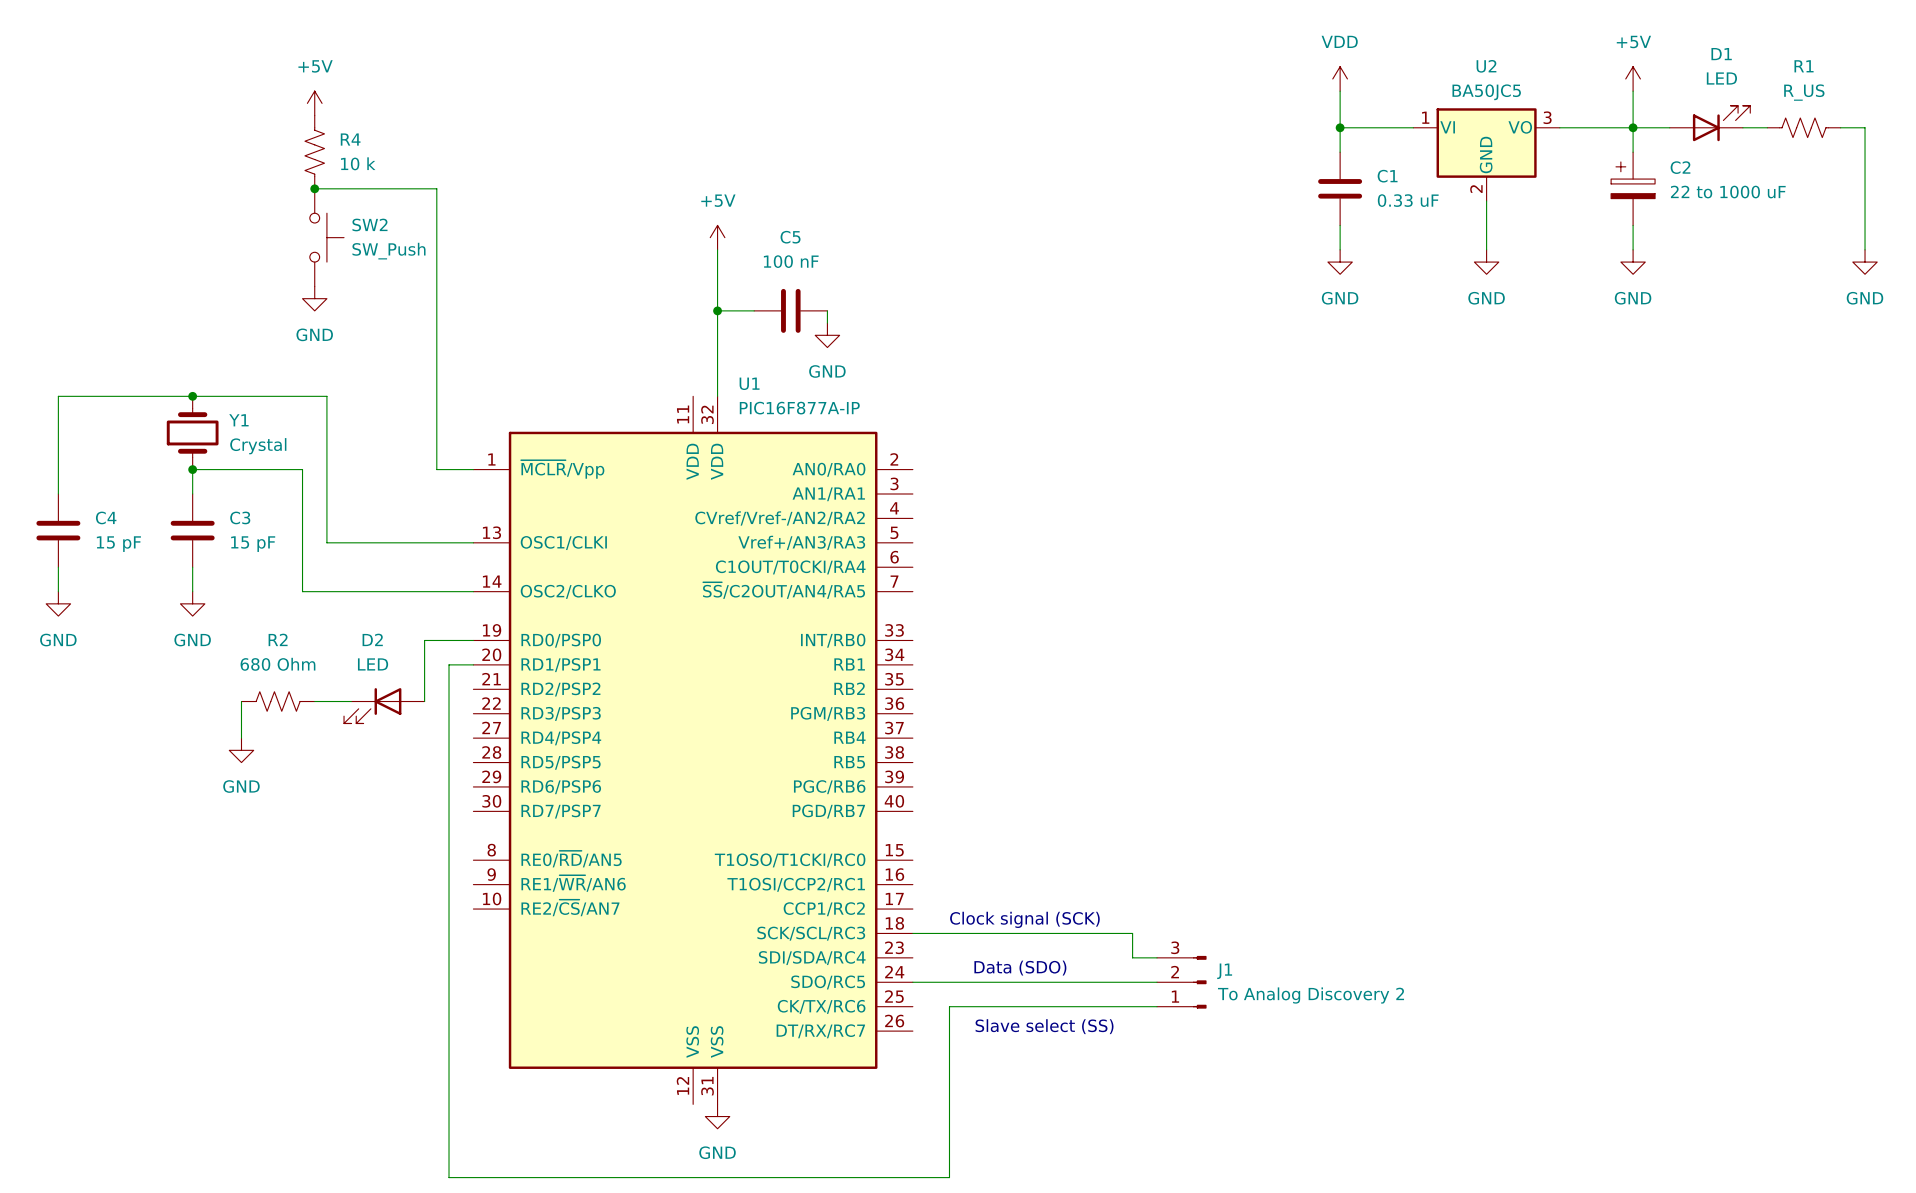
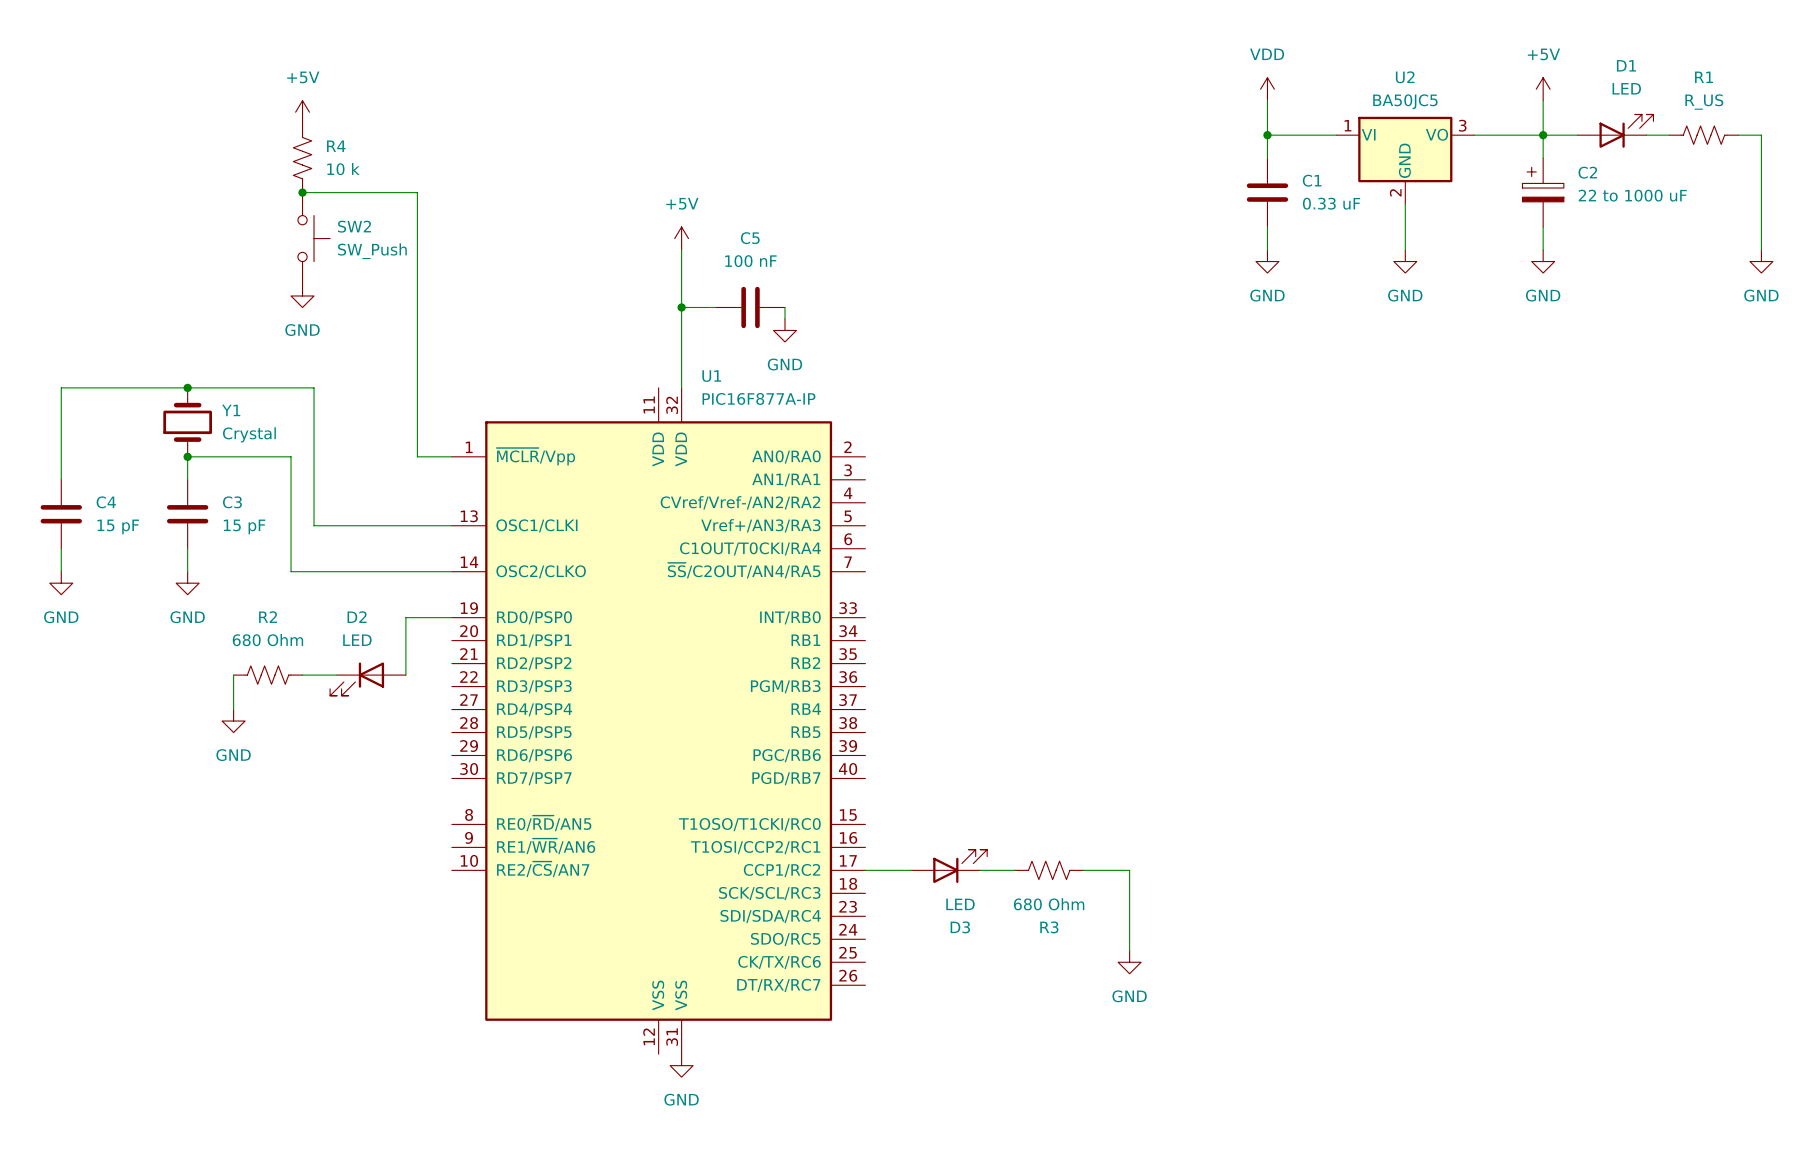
wire: (473, 664) (449, 664) (449, 1177) (949, 1177) (949, 1006) (1157, 1006) -> none
D3: none -> LED (949, 866)
wire: none -> (865, 870) (911, 870)
wire: none -> (980, 870) (1014, 870)
R3: none -> 680 Ohm (1049, 870)
wire: none -> (1083, 870) (1129, 870) (1129, 950)
text: Clock signal (SCK) (1024, 919) -> none
wire: (912, 933) (1132, 933) (1132, 957) (1157, 957) -> none
text: Data (SDO) (1020, 968) -> none
wire: (912, 982) (1157, 982) -> none
J1: To Analog Discovery 2 (1181, 982) -> none
power symbol: none -> GND (1129, 962)
text: Slave select (SS) (1044, 1026) -> none

